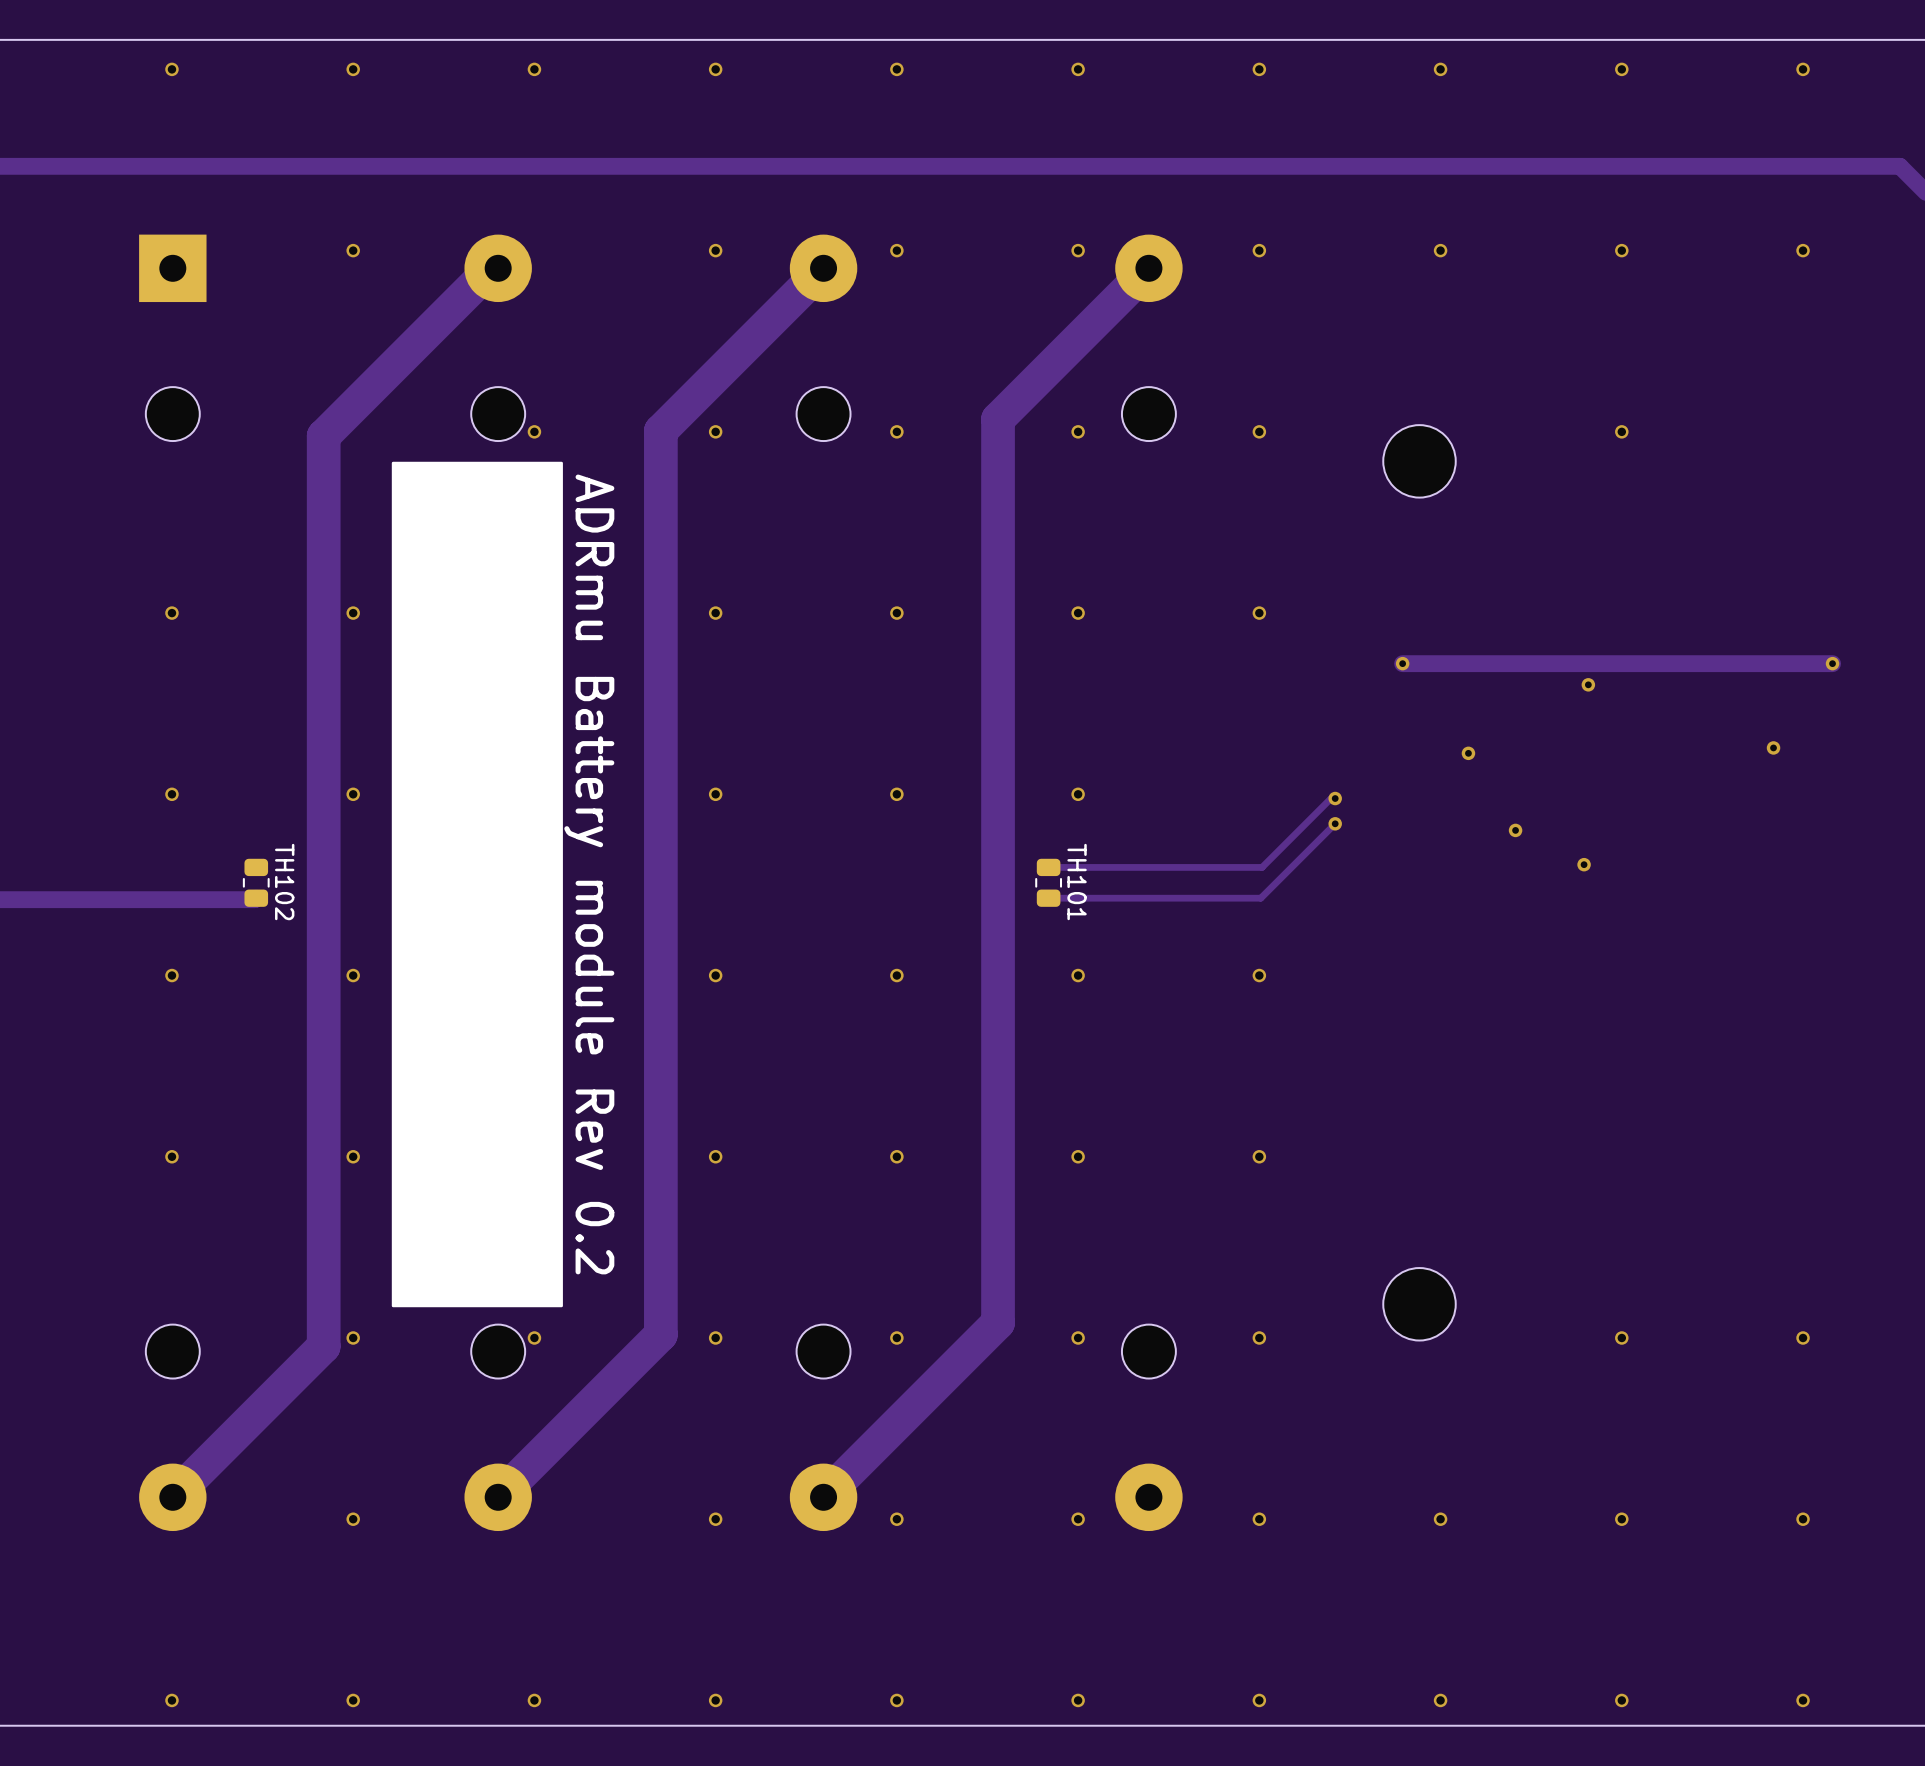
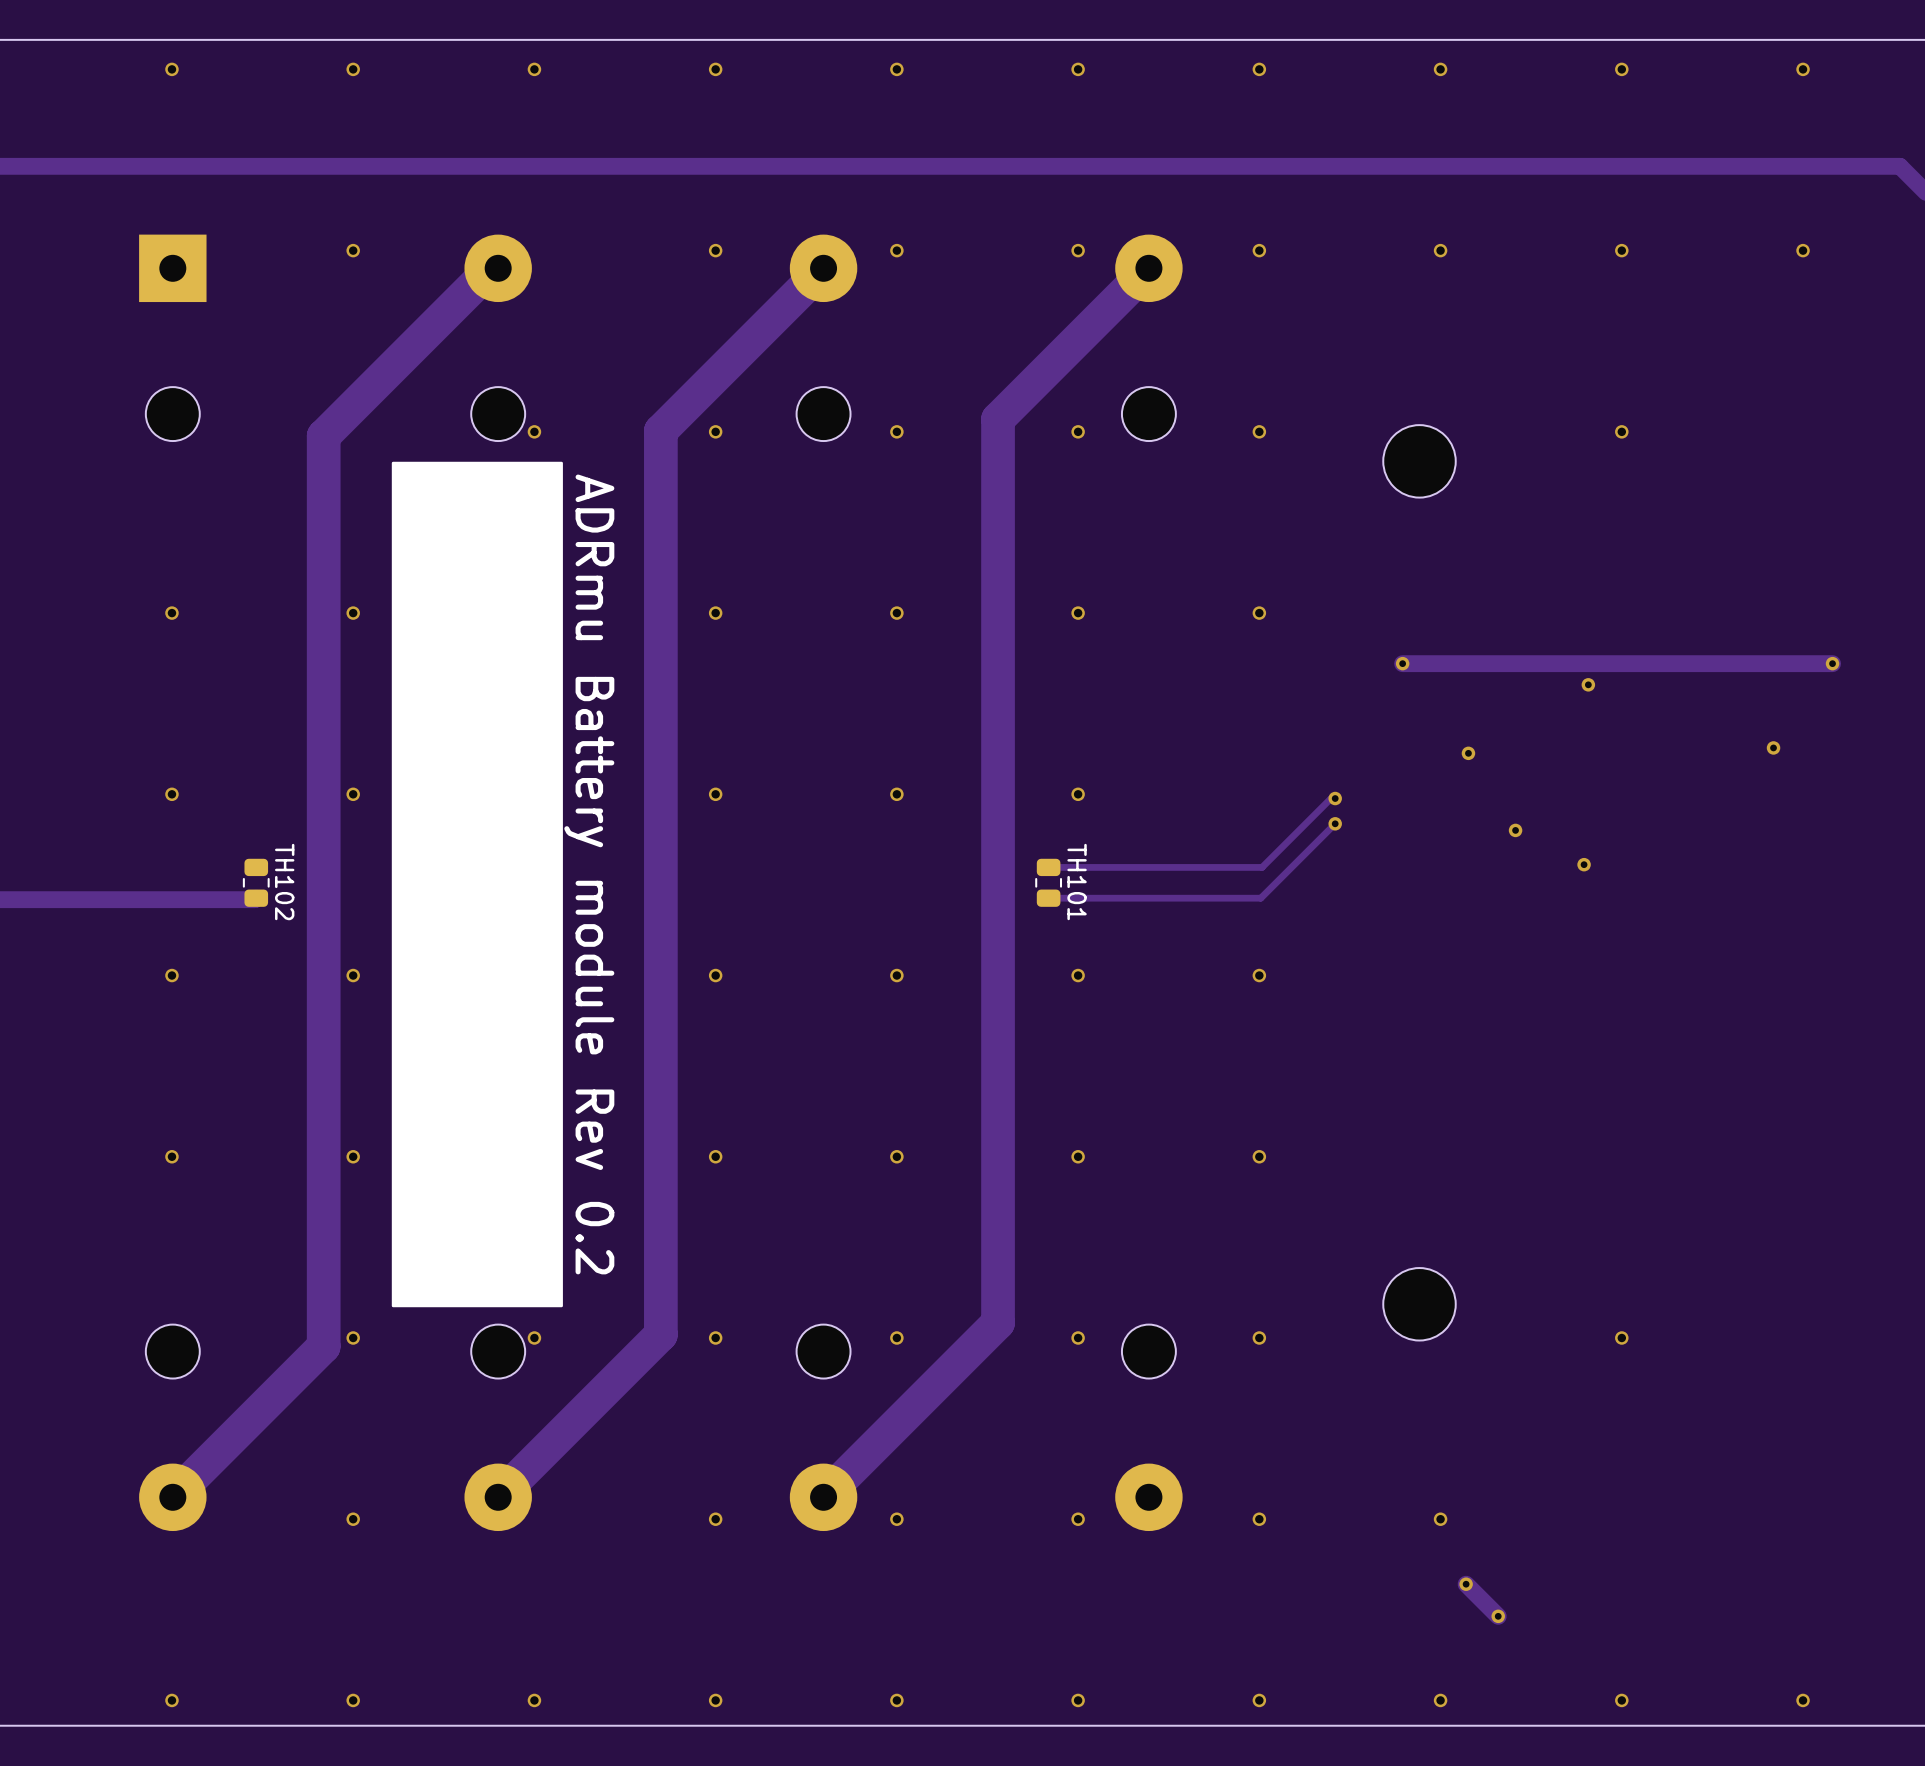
via: (1803, 1337) -> none
via: (1621, 1519) -> none
via: (1803, 1519) -> none
track: none -> (1466, 1584) (1498, 1616)
via: none -> (1466, 1584)
via: none -> (1498, 1616)

